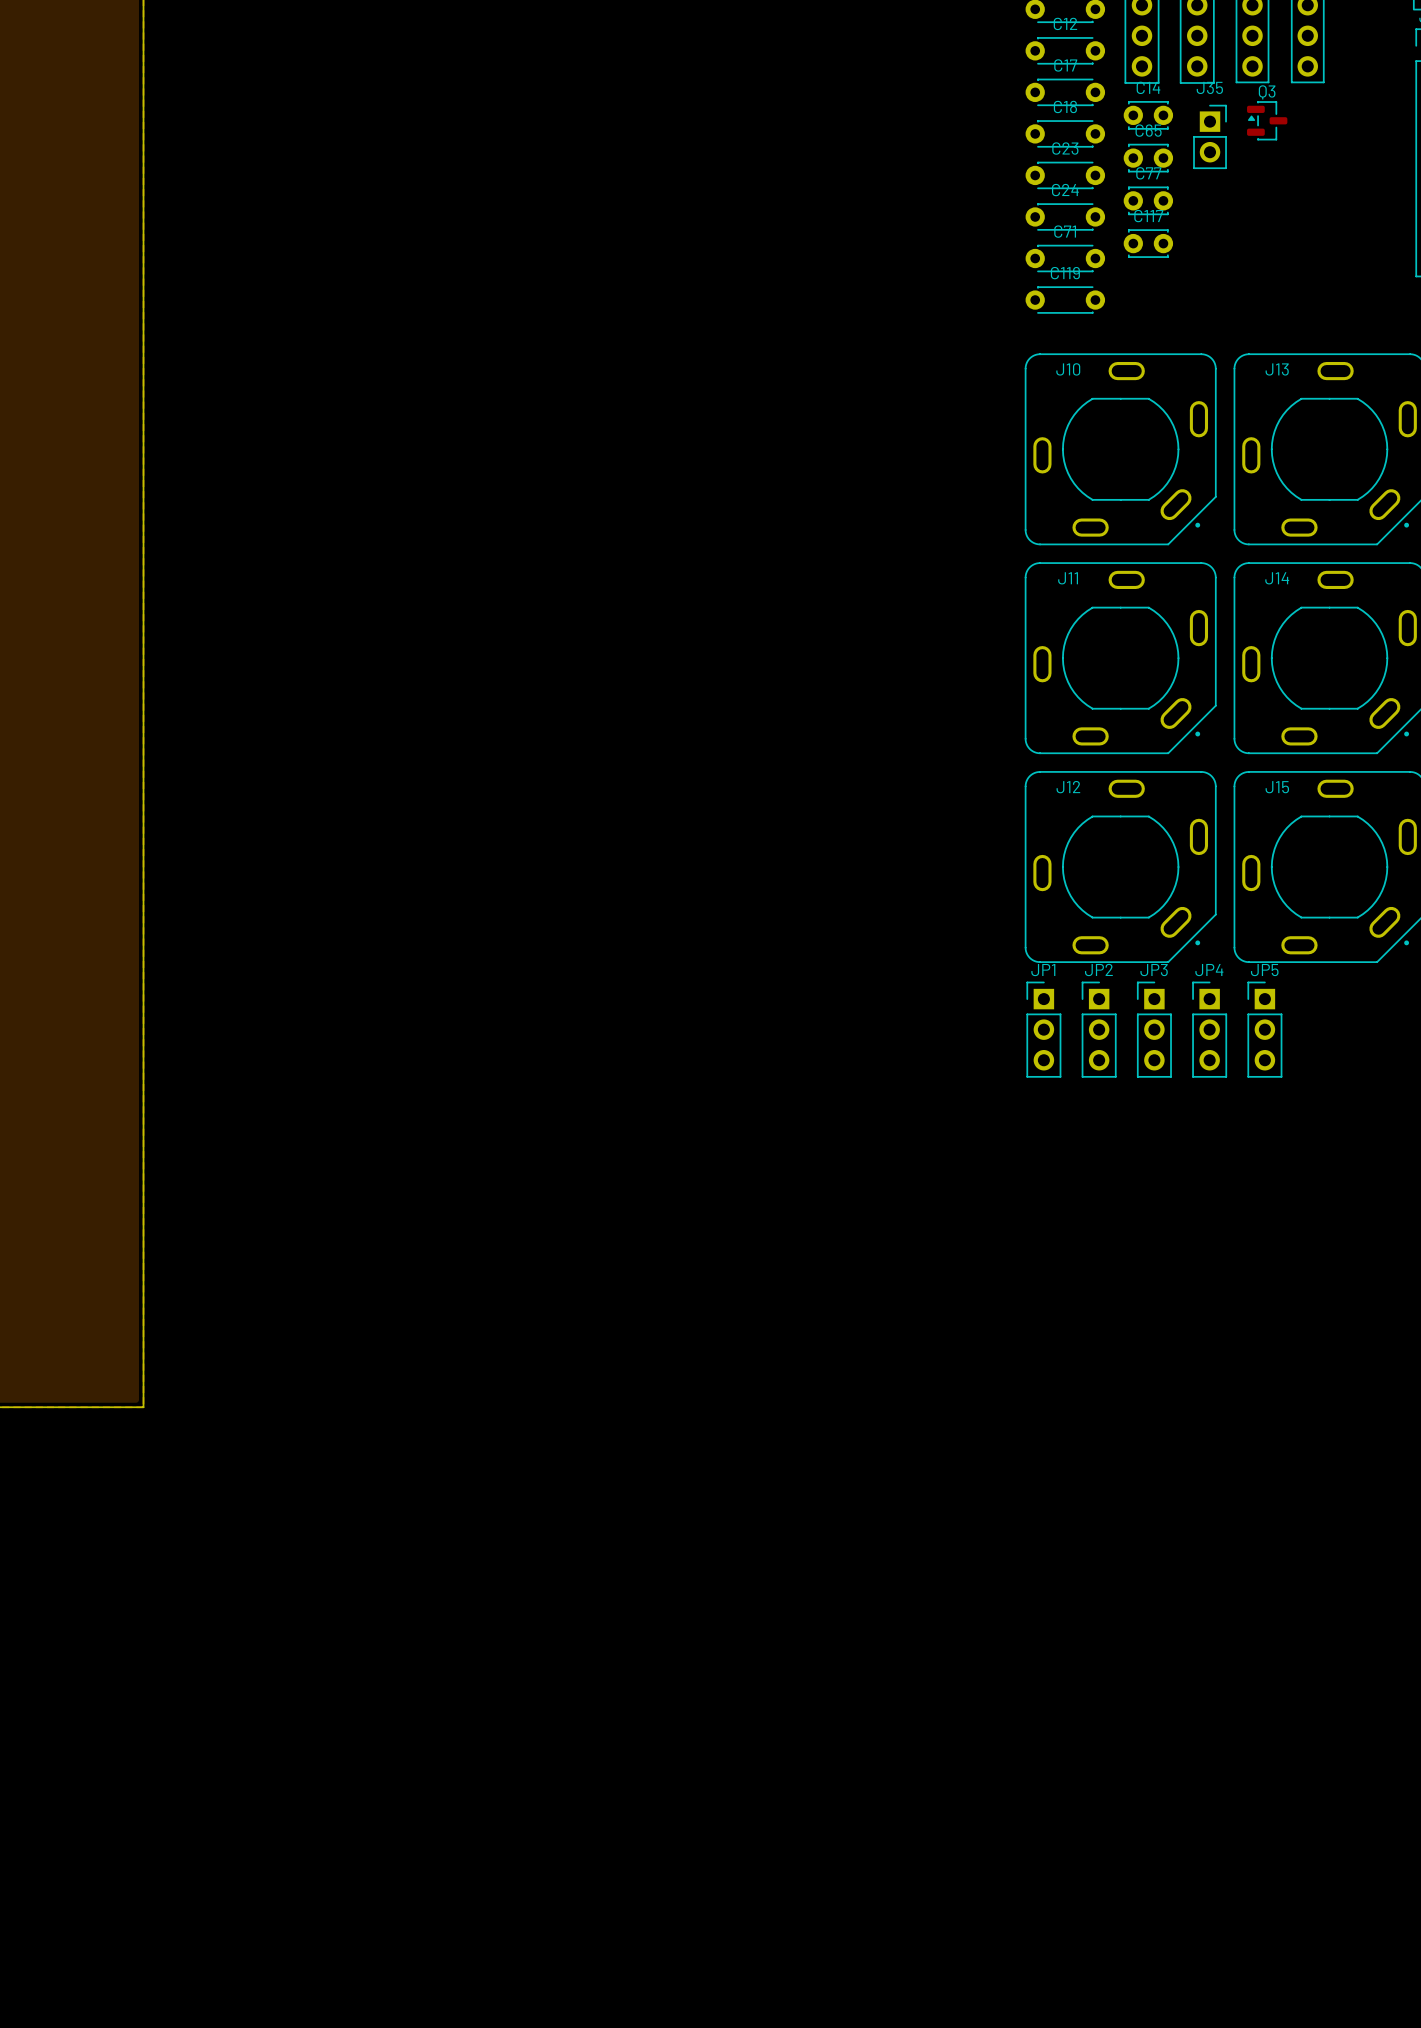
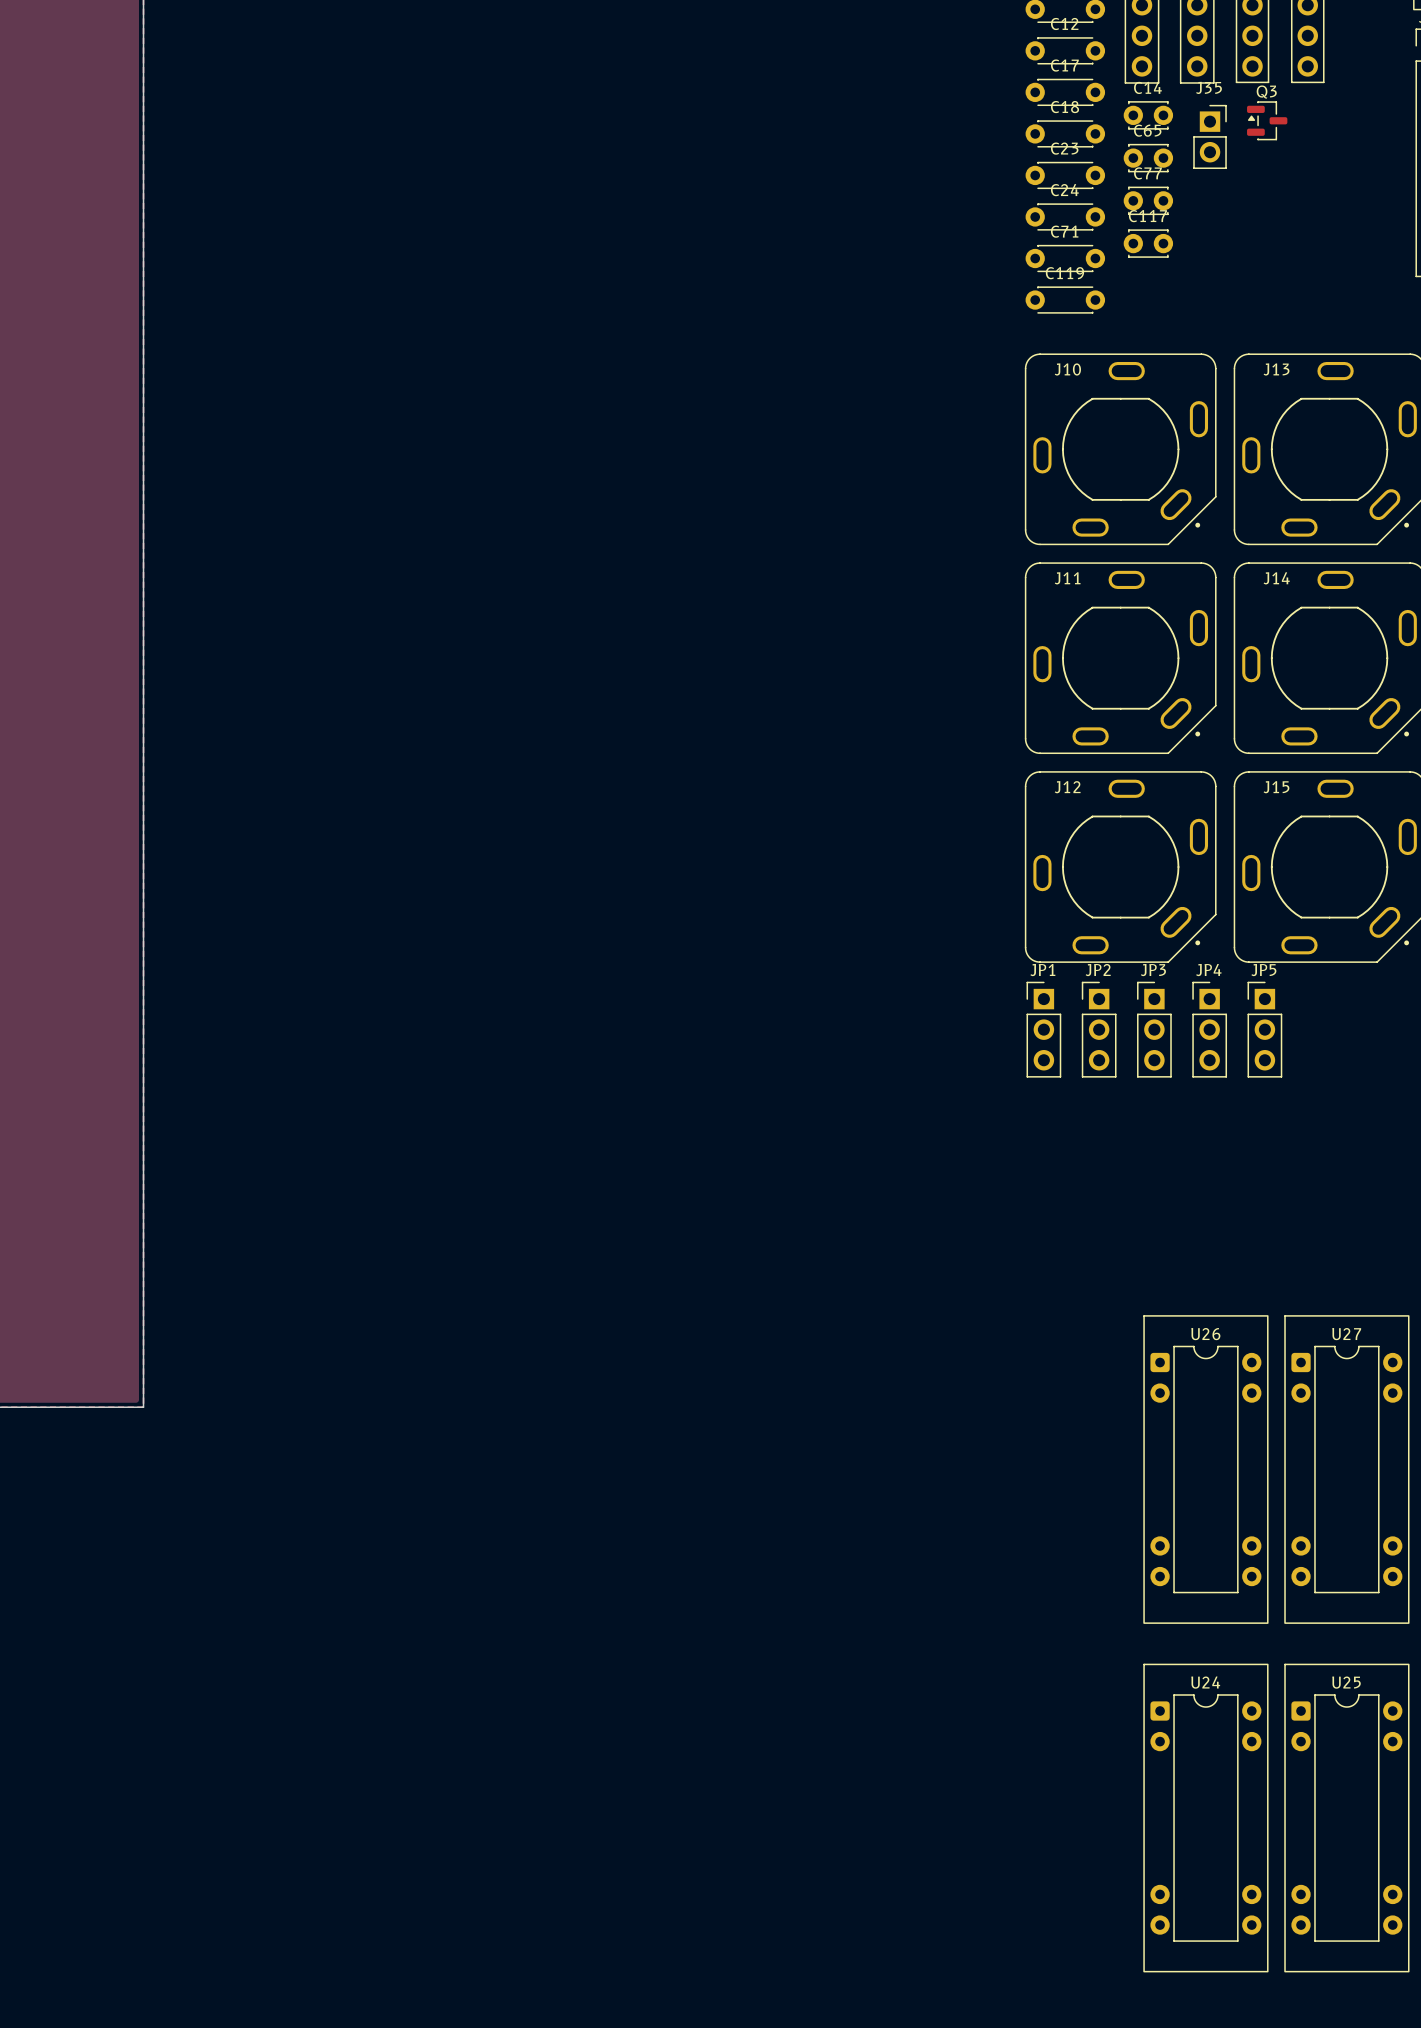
U26: none -> (1205, 1469)
U27: none -> (1346, 1469)
U24: none -> (1205, 1818)
U25: none -> (1346, 1818)

